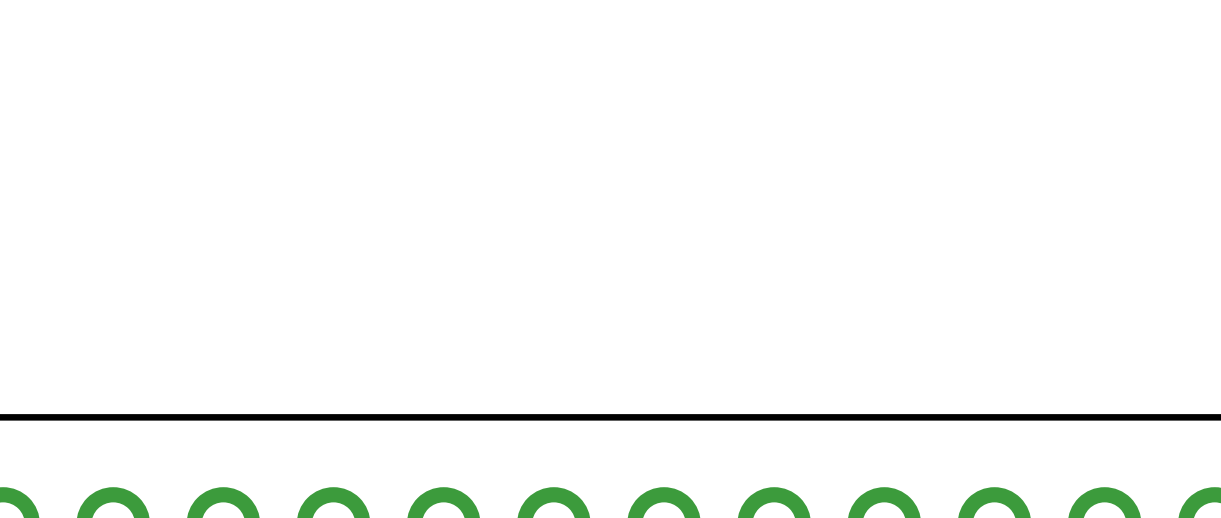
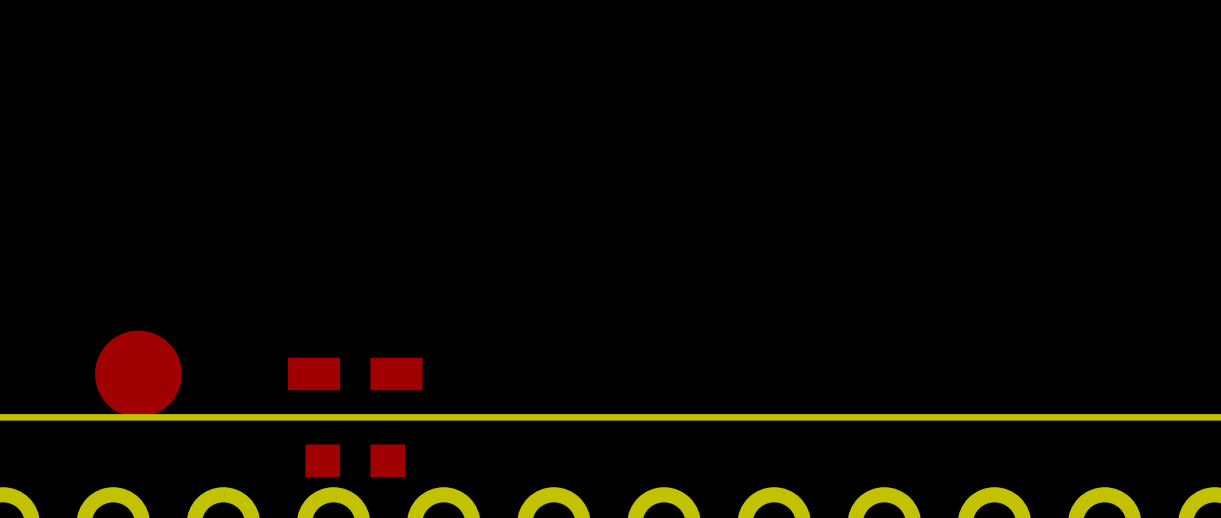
part: none -> (138, 373)
part: none -> (355, 373)
part: none -> (355, 460)

